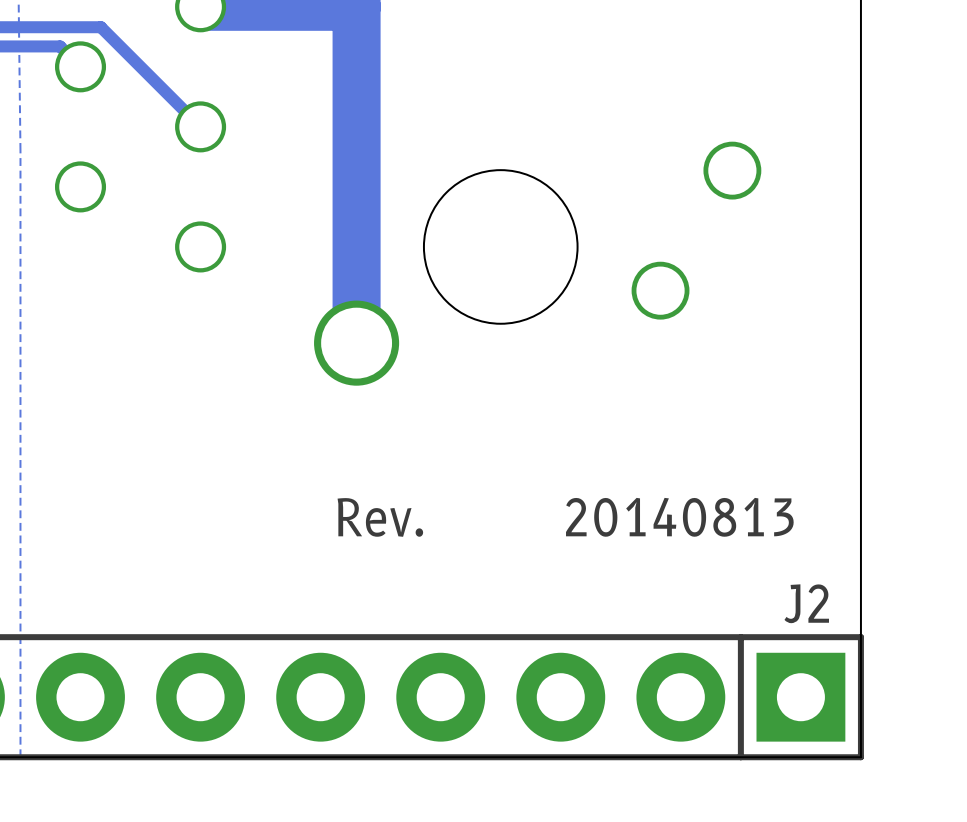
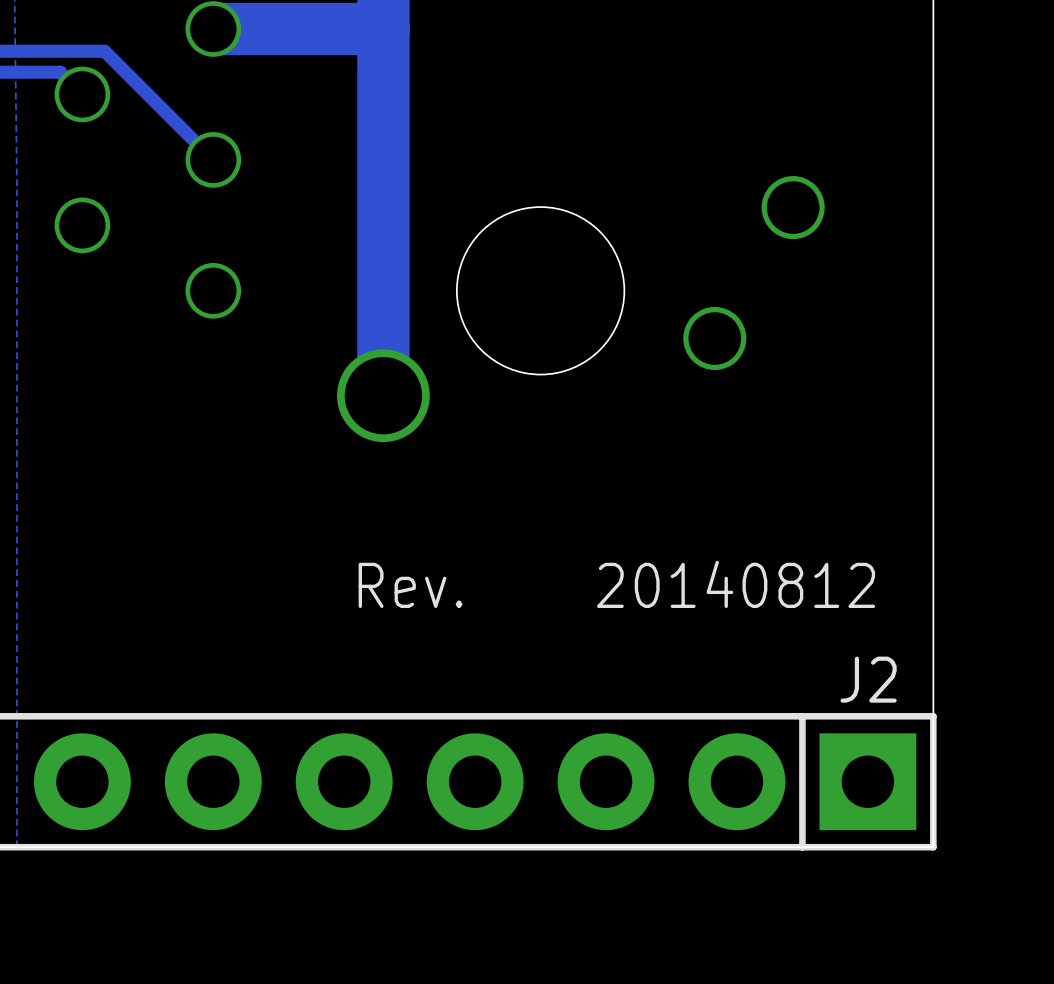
text: 20140813 (679, 517) -> 20140812 (736, 584)

